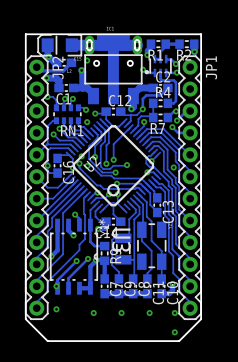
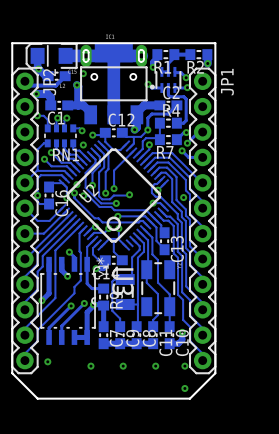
via: (56, 286) -> none

